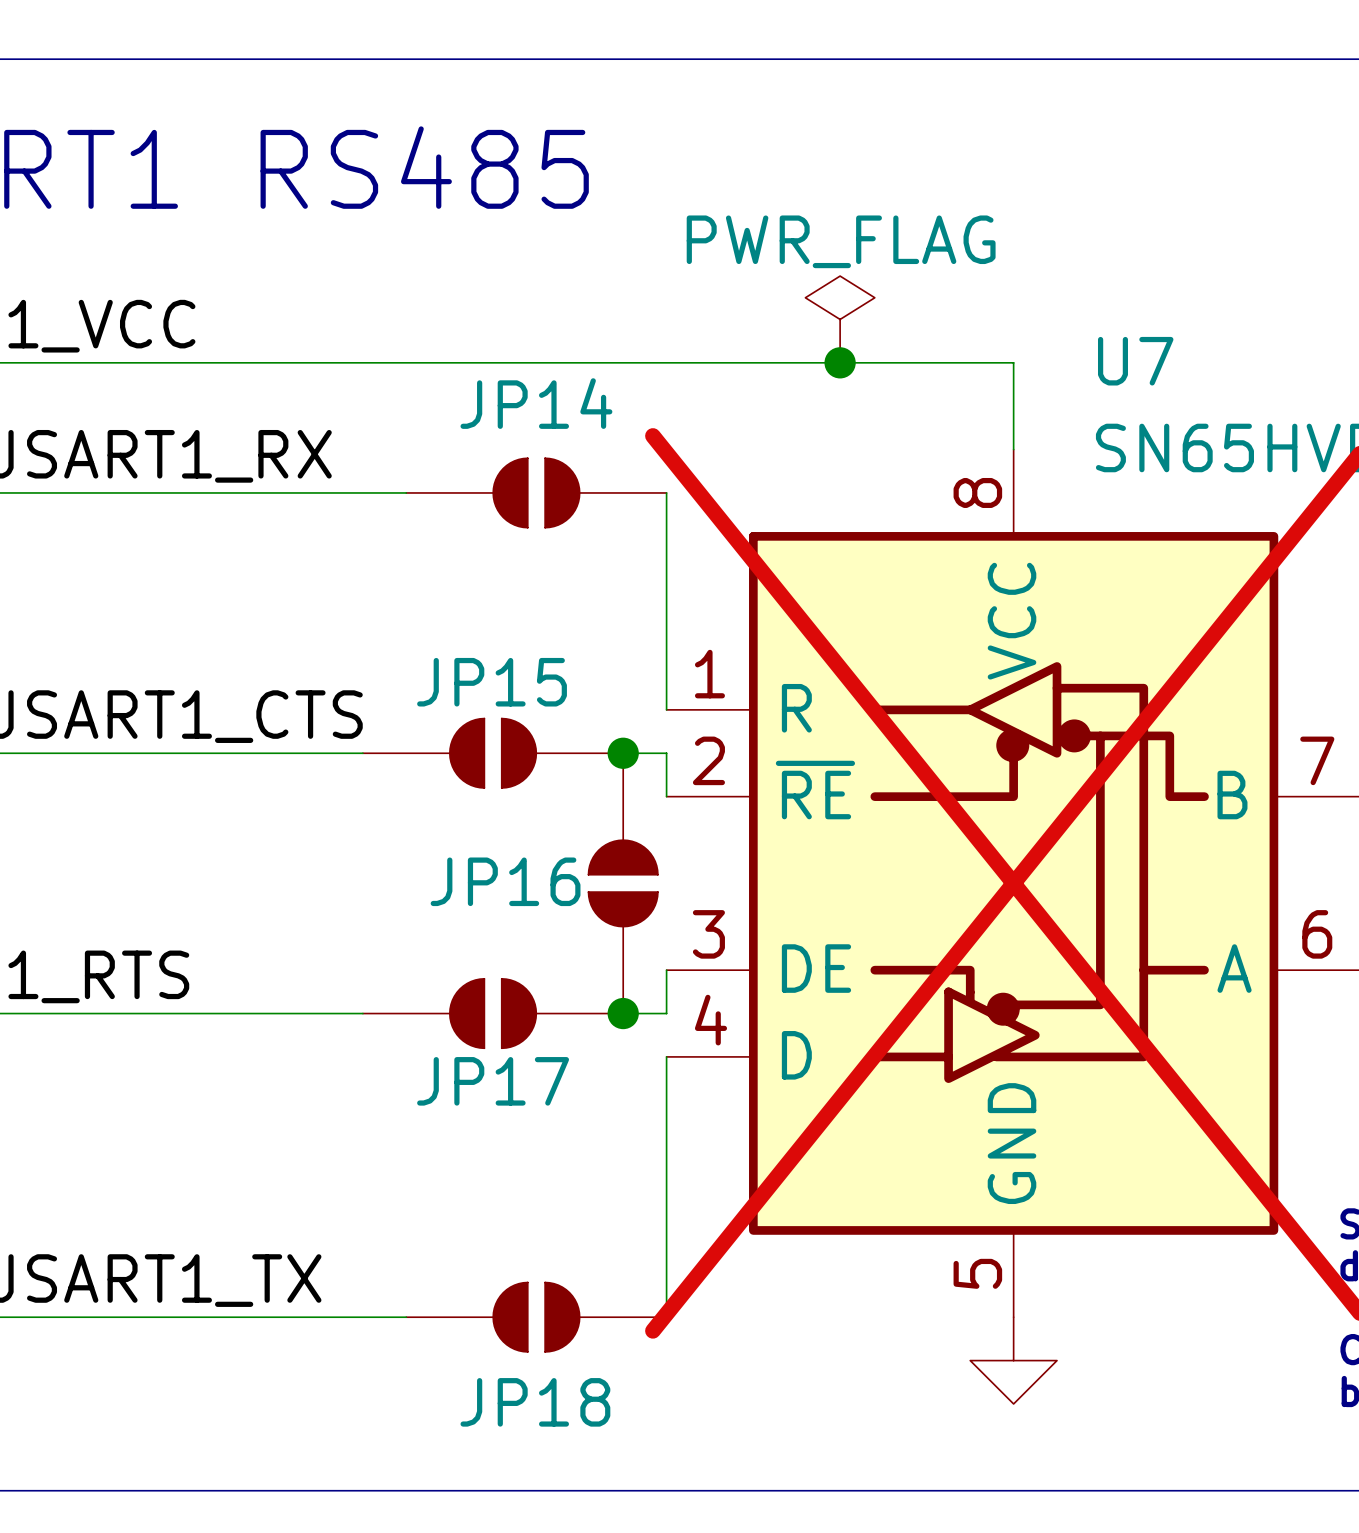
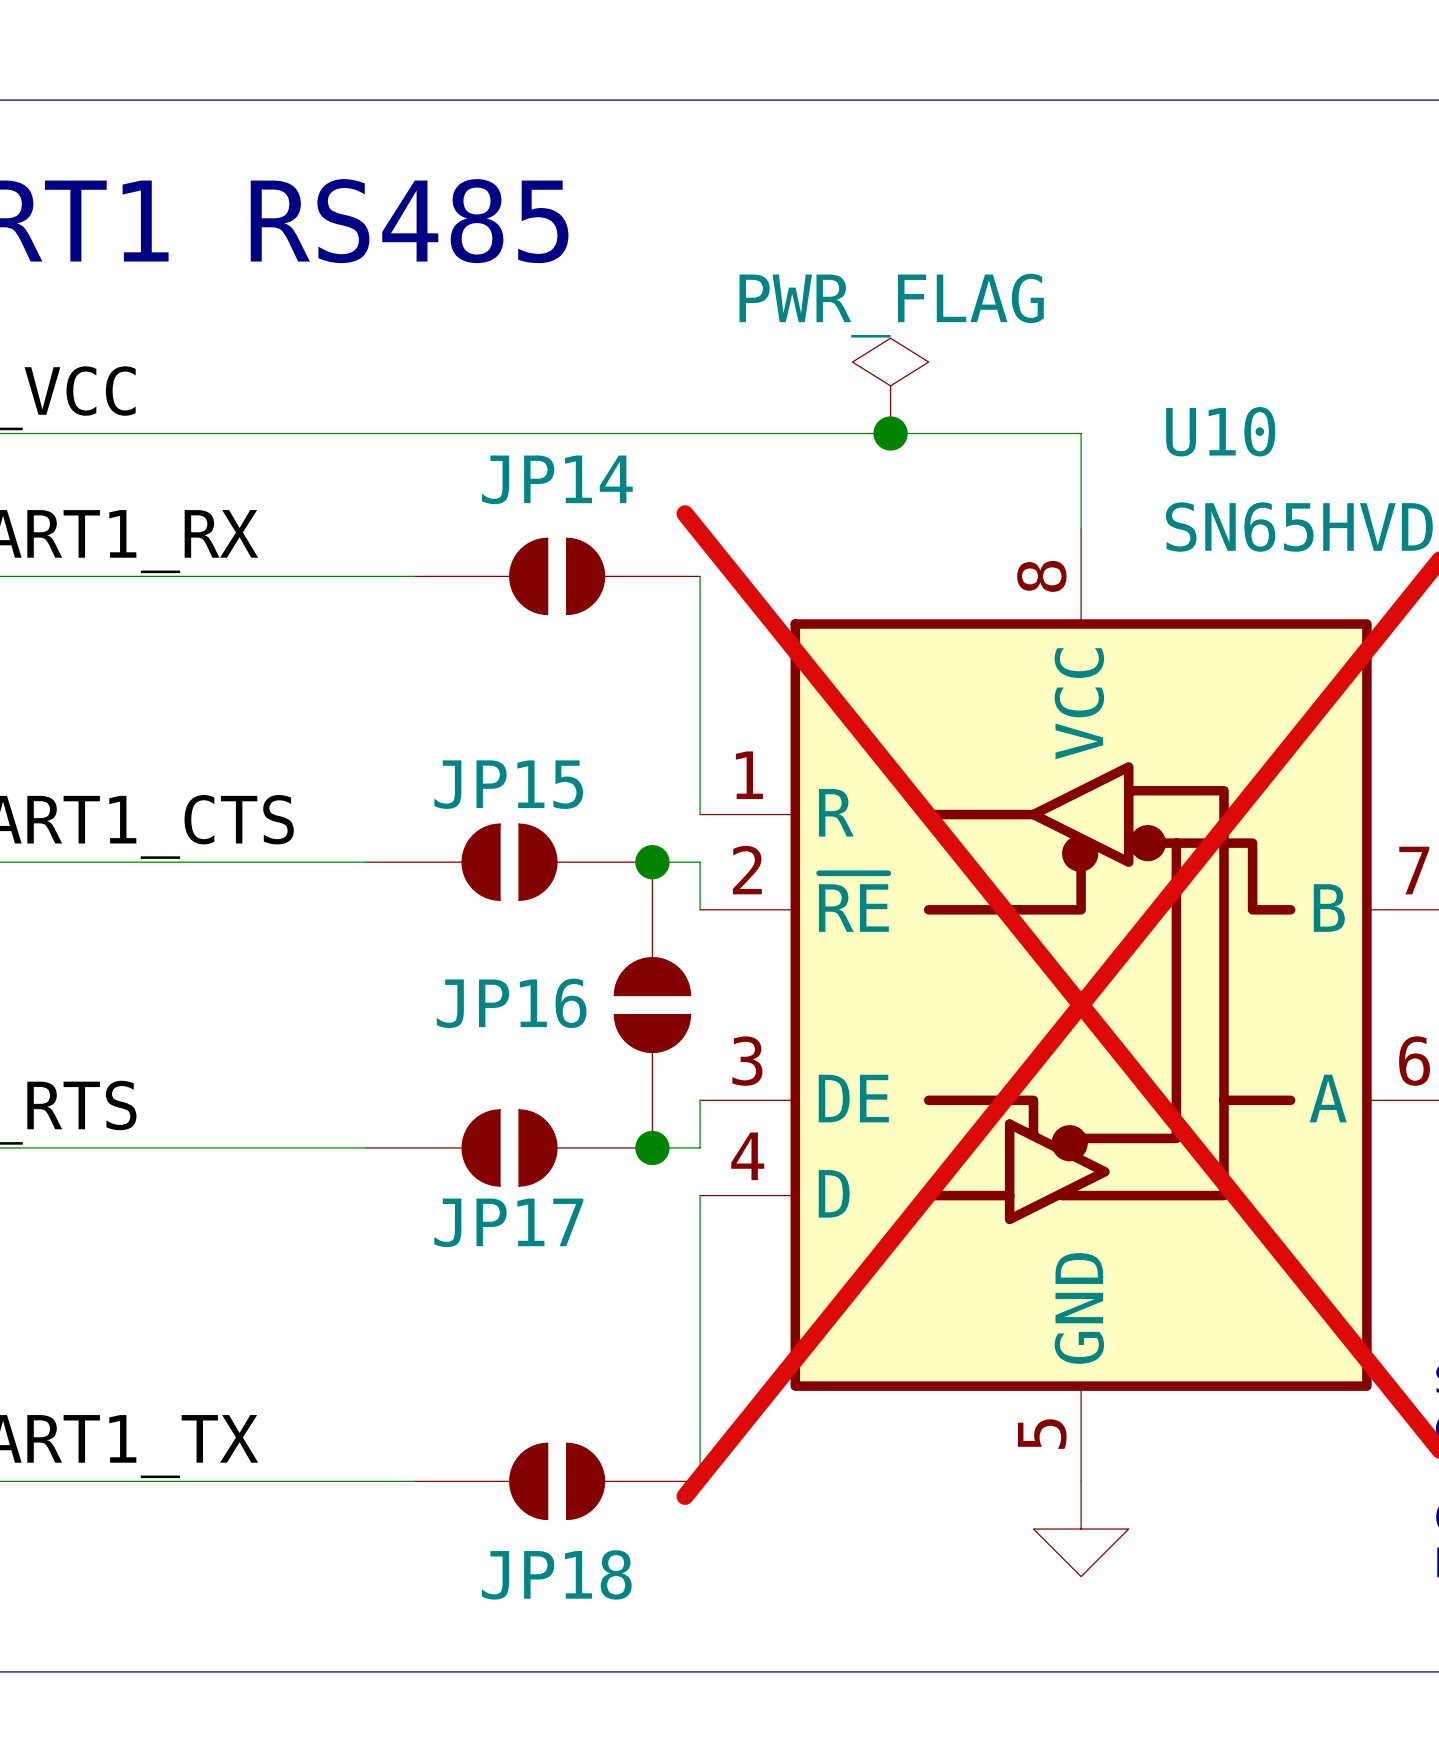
U7 name: U7 (1135, 361) -> U10 (1220, 431)

